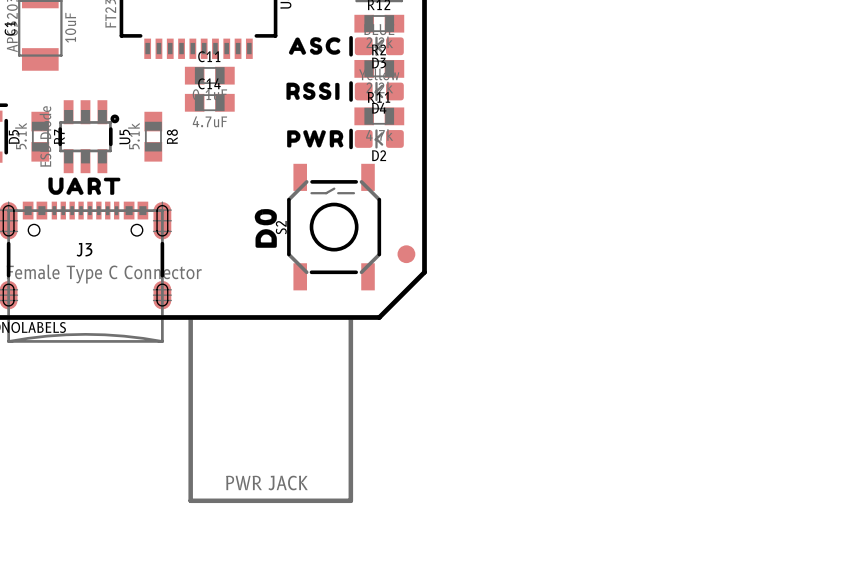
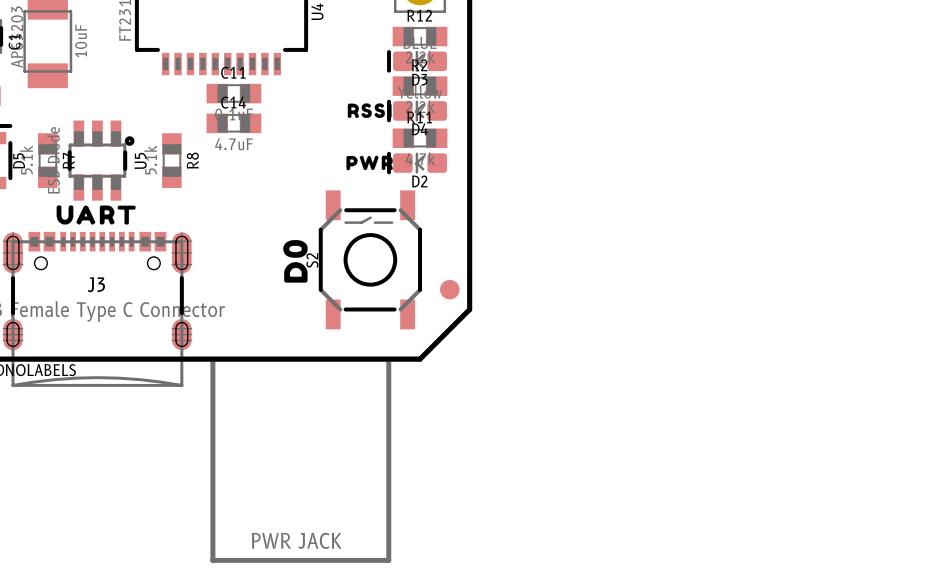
drawing: [288, 37, 341, 55] -> none
drawing: [286, 82, 340, 100] -> none
drawing: none -> [347, 103, 392, 119]
drawing: [287, 130, 344, 148] -> none
drawing: none -> [346, 155, 393, 171]

